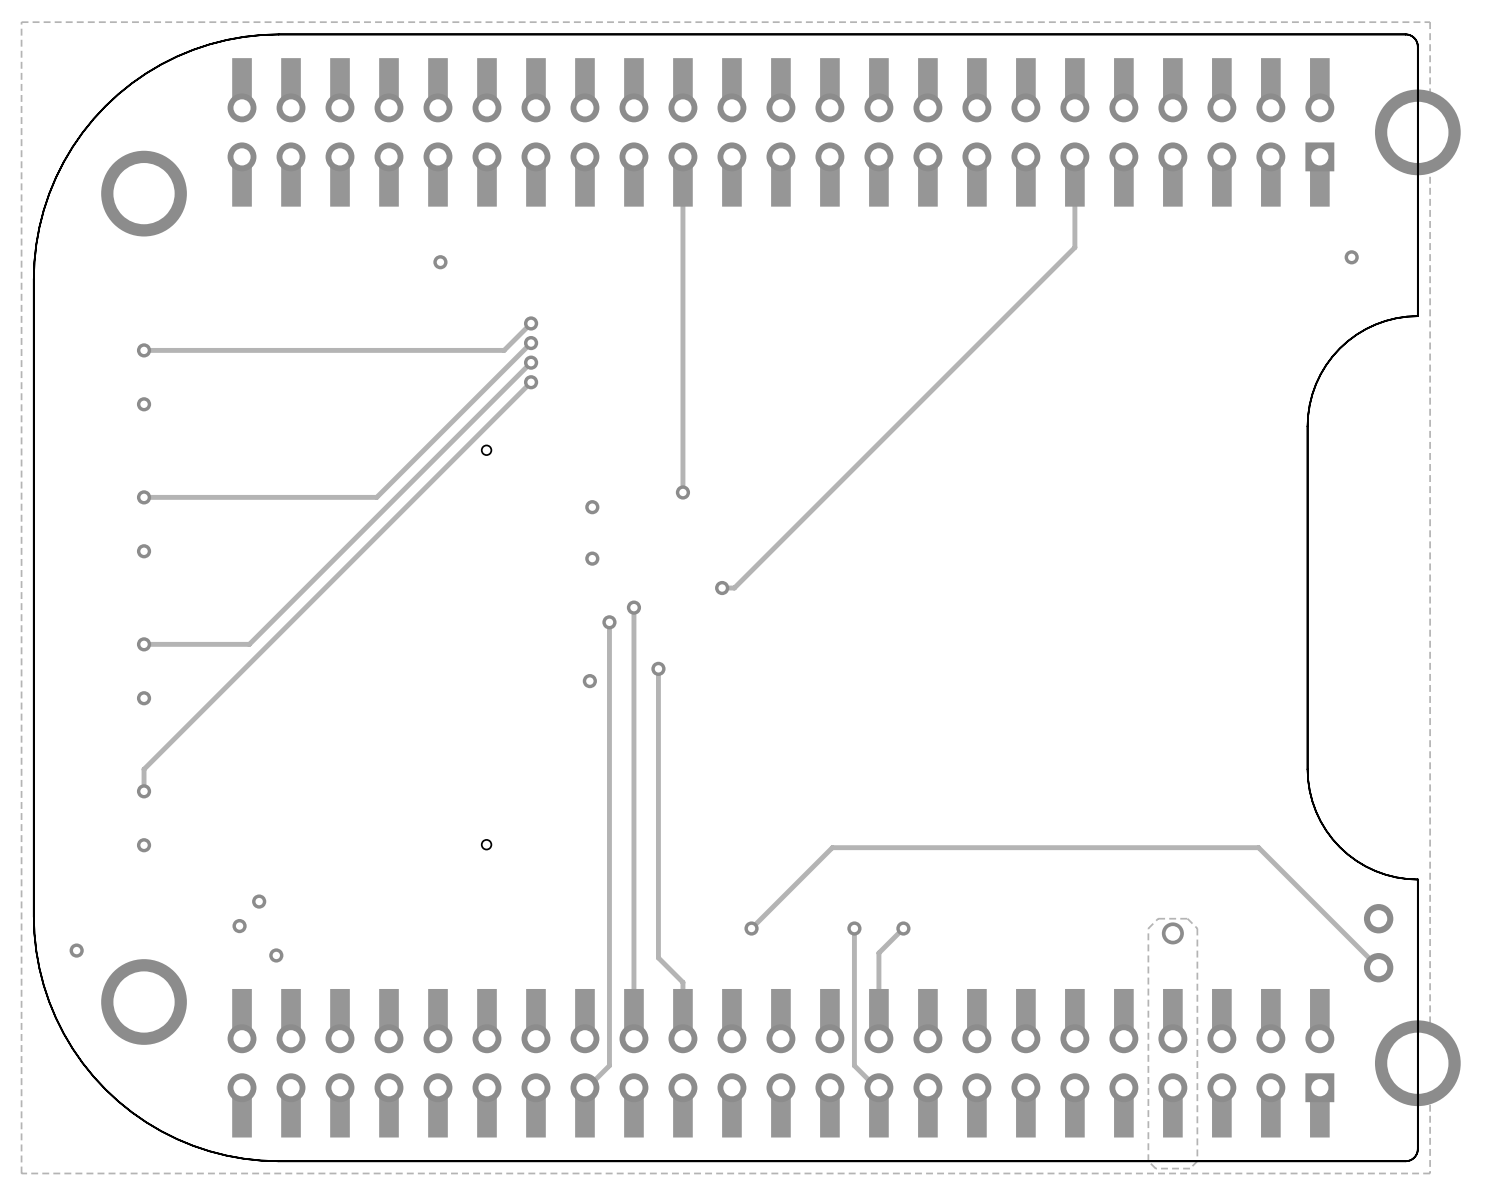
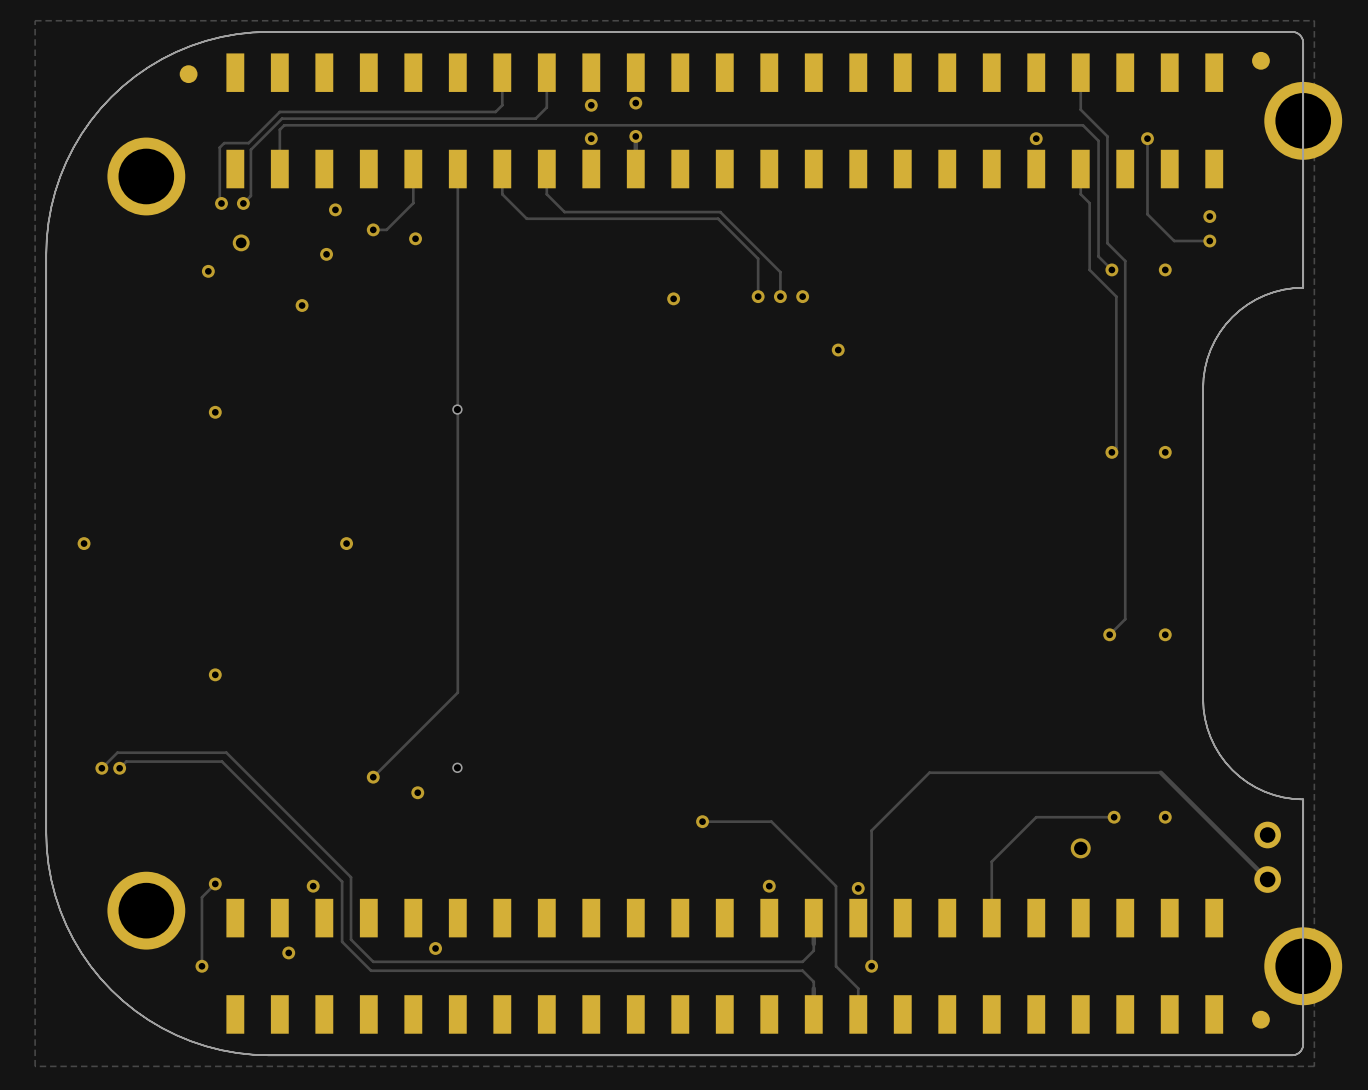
part footprint: [33, 34, 1461, 1162] -> [46, 31, 1343, 1056]
part: none -> (1260, 60)
track: none -> (502, 72) (502, 105) (495, 111) (279, 111) (248, 143) (224, 143) (219, 147) (219, 201) (221, 203)
track: none -> (546, 72) (546, 107) (535, 118) (282, 118) (250, 149) (250, 195) (243, 203)
track: none -> (1080, 72) (1080, 109) (1107, 136) (1107, 243) (1125, 261) (1125, 619) (1109, 634)
part: none -> (188, 74)
via: none -> (635, 103)
via: none -> (591, 105)
via: none -> (635, 136)
via: none -> (591, 138)
via: none -> (1036, 138)
track: none -> (1147, 138) (1147, 214) (1174, 241) (1209, 241)
via: none -> (1147, 138)
track: (1074, 156) (1074, 247) (734, 588) (722, 588) -> none
track: none -> (279, 169) (279, 129) (284, 125) (1082, 125) (1098, 140) (1098, 256) (1111, 269)
track: none -> (413, 169) (413, 203) (386, 229) (373, 229)
track: none -> (457, 169) (457, 692) (373, 777)
track: none -> (502, 169) (502, 194) (526, 218) (718, 218) (758, 258) (758, 296)
track: none -> (546, 169) (546, 194) (564, 212) (720, 212) (780, 272) (780, 296)
track: (682, 185) (682, 492) -> none
track: none -> (1080, 169) (1080, 194) (1089, 203) (1089, 269) (1116, 296) (1116, 447) (1111, 452)
via: none -> (221, 203)
via: none -> (243, 203)
via: none -> (335, 209)
via: none -> (1209, 216)
via: none -> (373, 229)
via: (1351, 257) -> none
via: none -> (1209, 241)
via: none -> (241, 242)
via: none -> (326, 254)
via: none -> (1111, 269)
via: none -> (1165, 269)
via: none -> (208, 271)
track: (531, 323) (504, 350) (144, 350) -> none
via: (531, 323) -> none
via: none -> (758, 296)
via: none -> (780, 296)
via: none -> (802, 296)
via: none -> (673, 298)
via: none -> (302, 305)
track: (531, 343) (376, 497) (144, 497) -> none
via: (531, 343) -> none
via: (144, 350) -> none
track: (531, 362) (249, 644) (144, 644) -> none
via: (531, 362) -> none
track: (531, 382) (144, 769) (144, 791) -> none
via: (531, 382) -> none
via: none -> (838, 350)
via: (144, 404) -> none
via: none -> (215, 412)
via: (682, 492) -> none
via: (144, 497) -> none
via: none -> (1111, 452)
via: none -> (1165, 452)
via: (592, 507) -> none
via: (144, 551) -> none
via: (592, 558) -> none
via: (722, 588) -> none
via: none -> (84, 543)
via: none -> (346, 543)
track: (633, 607) (633, 1038) -> none
via: (633, 607) -> none
track: (609, 622) (609, 1065) (584, 1090) -> none
via: (609, 622) -> none
via: (144, 644) -> none
track: (658, 668) (658, 957) (682, 982) (682, 1038) -> none
via: (658, 668) -> none
via: (589, 681) -> none
via: (144, 698) -> none
via: none -> (1109, 634)
via: none -> (1165, 634)
via: none -> (215, 674)
via: (144, 791) -> none
track: none -> (101, 768) (117, 752) (226, 752) (351, 877) (351, 939) (373, 961) (802, 961) (813, 950) (813, 944)
via: none -> (101, 768)
track: none -> (119, 768) (126, 761) (221, 761) (342, 881) (342, 941) (371, 970) (802, 970) (813, 981) (813, 988)
via: none -> (119, 768)
via: (144, 845) -> none
track: (1261, 850) (1258, 847) (832, 847) (751, 928) -> (1160, 772) (929, 772) (871, 830) (871, 966)
via: none -> (373, 777)
via: none -> (417, 792)
track: none -> (1114, 817) (1036, 817) (991, 861) (991, 918)
via: none -> (1114, 817)
via: none -> (1165, 817)
via: (259, 901) -> none
track: none -> (702, 821) (771, 821) (836, 886) (836, 966) (858, 988) (858, 1014)
zone outline: (1187, 918) (1158, 918) (1148, 928) (1148, 1161) (1155, 1168) (1190, 1168) (1197, 1161) (1197, 928) (1187, 918) -> none
via: (239, 926) -> none
via position: (751, 928) -> (702, 821)
track: (854, 928) (854, 1065) (878, 1090) -> none
via: (854, 928) -> none
track: (903, 928) (878, 953) (878, 1010) -> none
via: (903, 928) -> none
via: (76, 950) -> none
via: (276, 955) -> none
track: none -> (215, 883) (201, 897) (201, 966)
via: none -> (215, 883)
via: none -> (313, 886)
via: none -> (769, 886)
via: none -> (858, 888)
via: none -> (435, 948)
via: none -> (288, 952)
via: none -> (201, 966)
via: none -> (871, 966)
part: none -> (1260, 1019)

